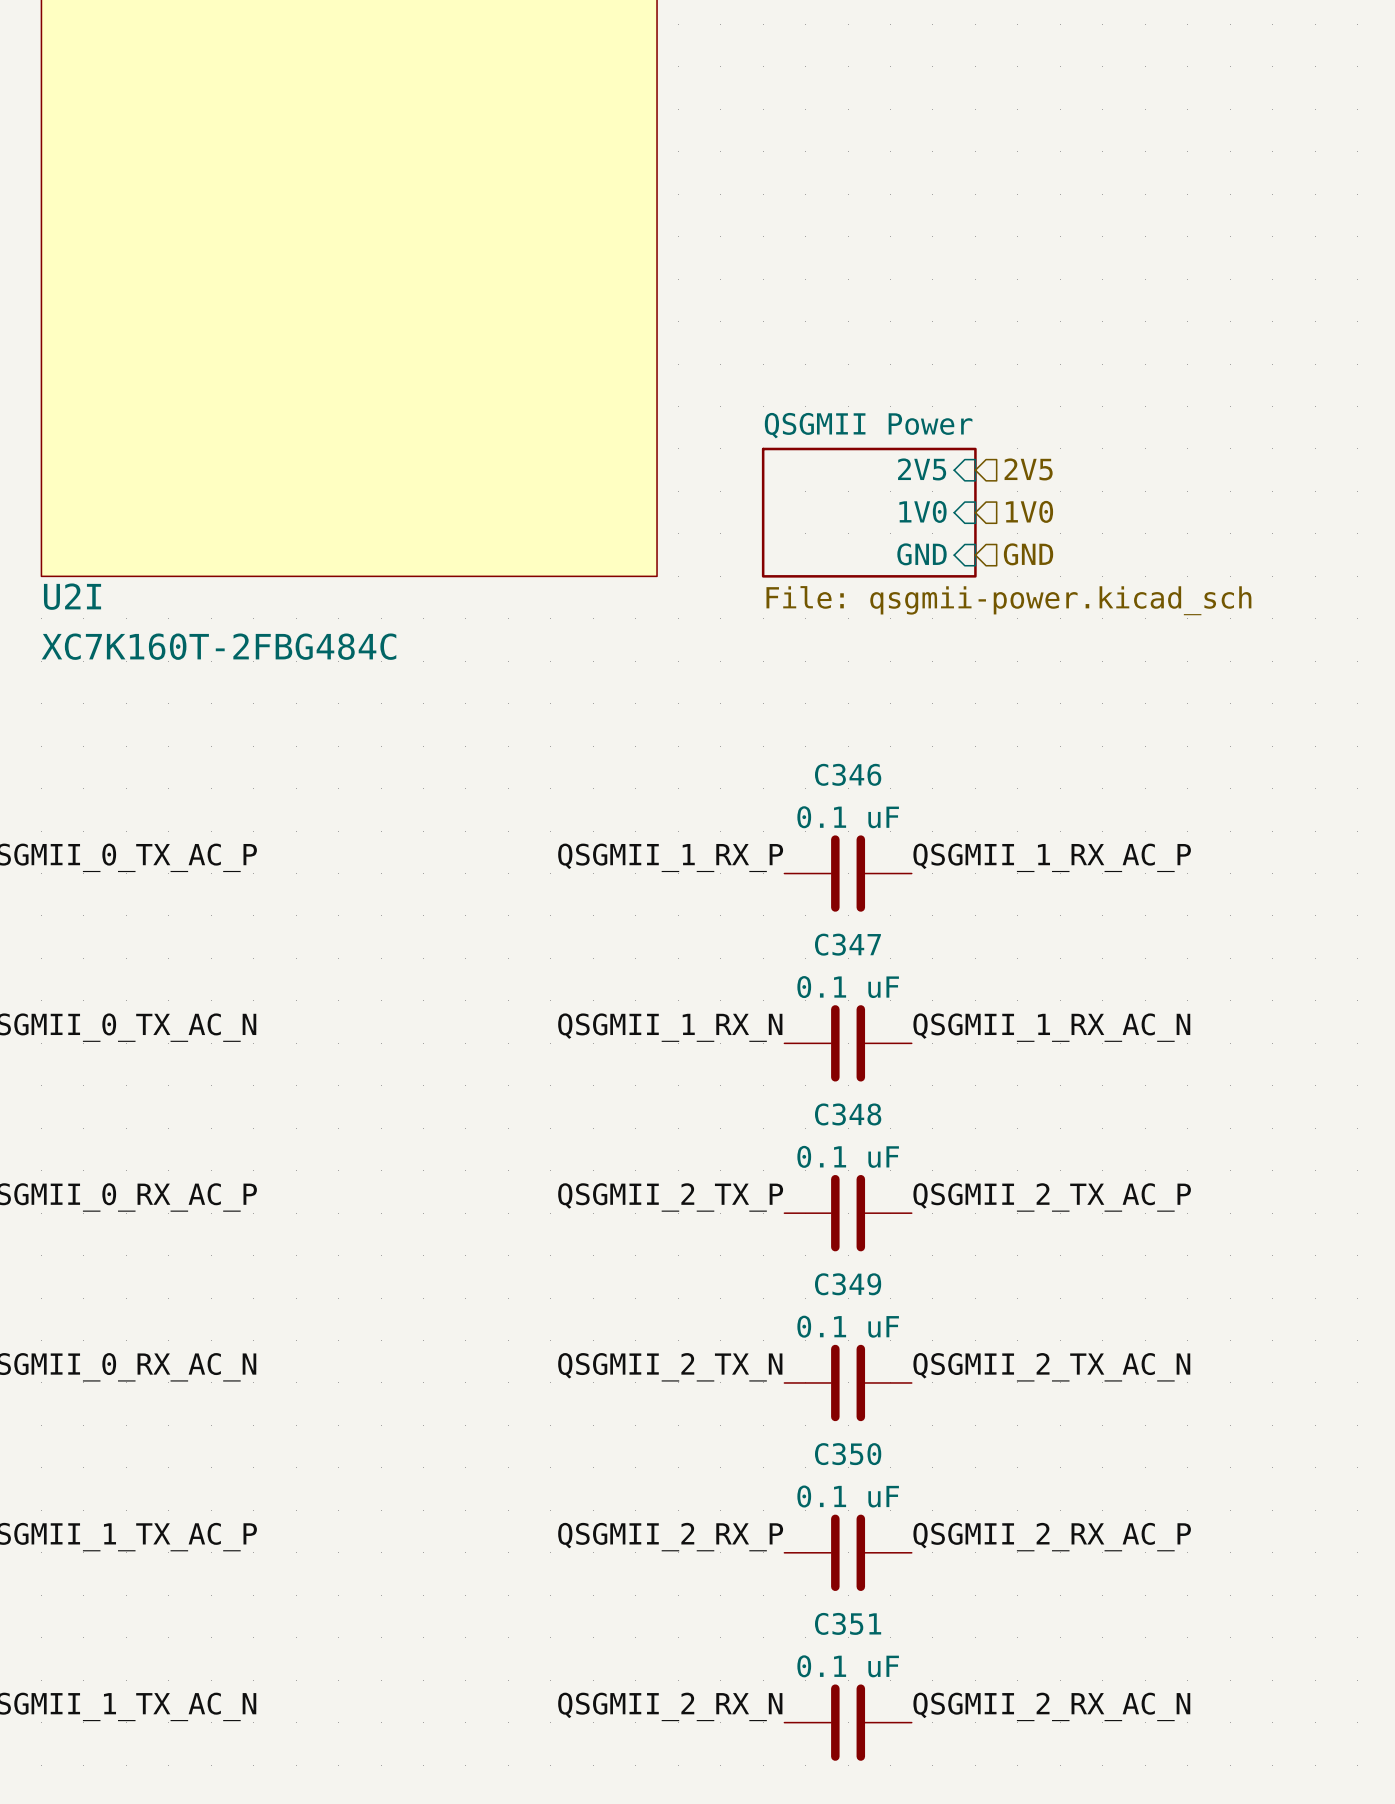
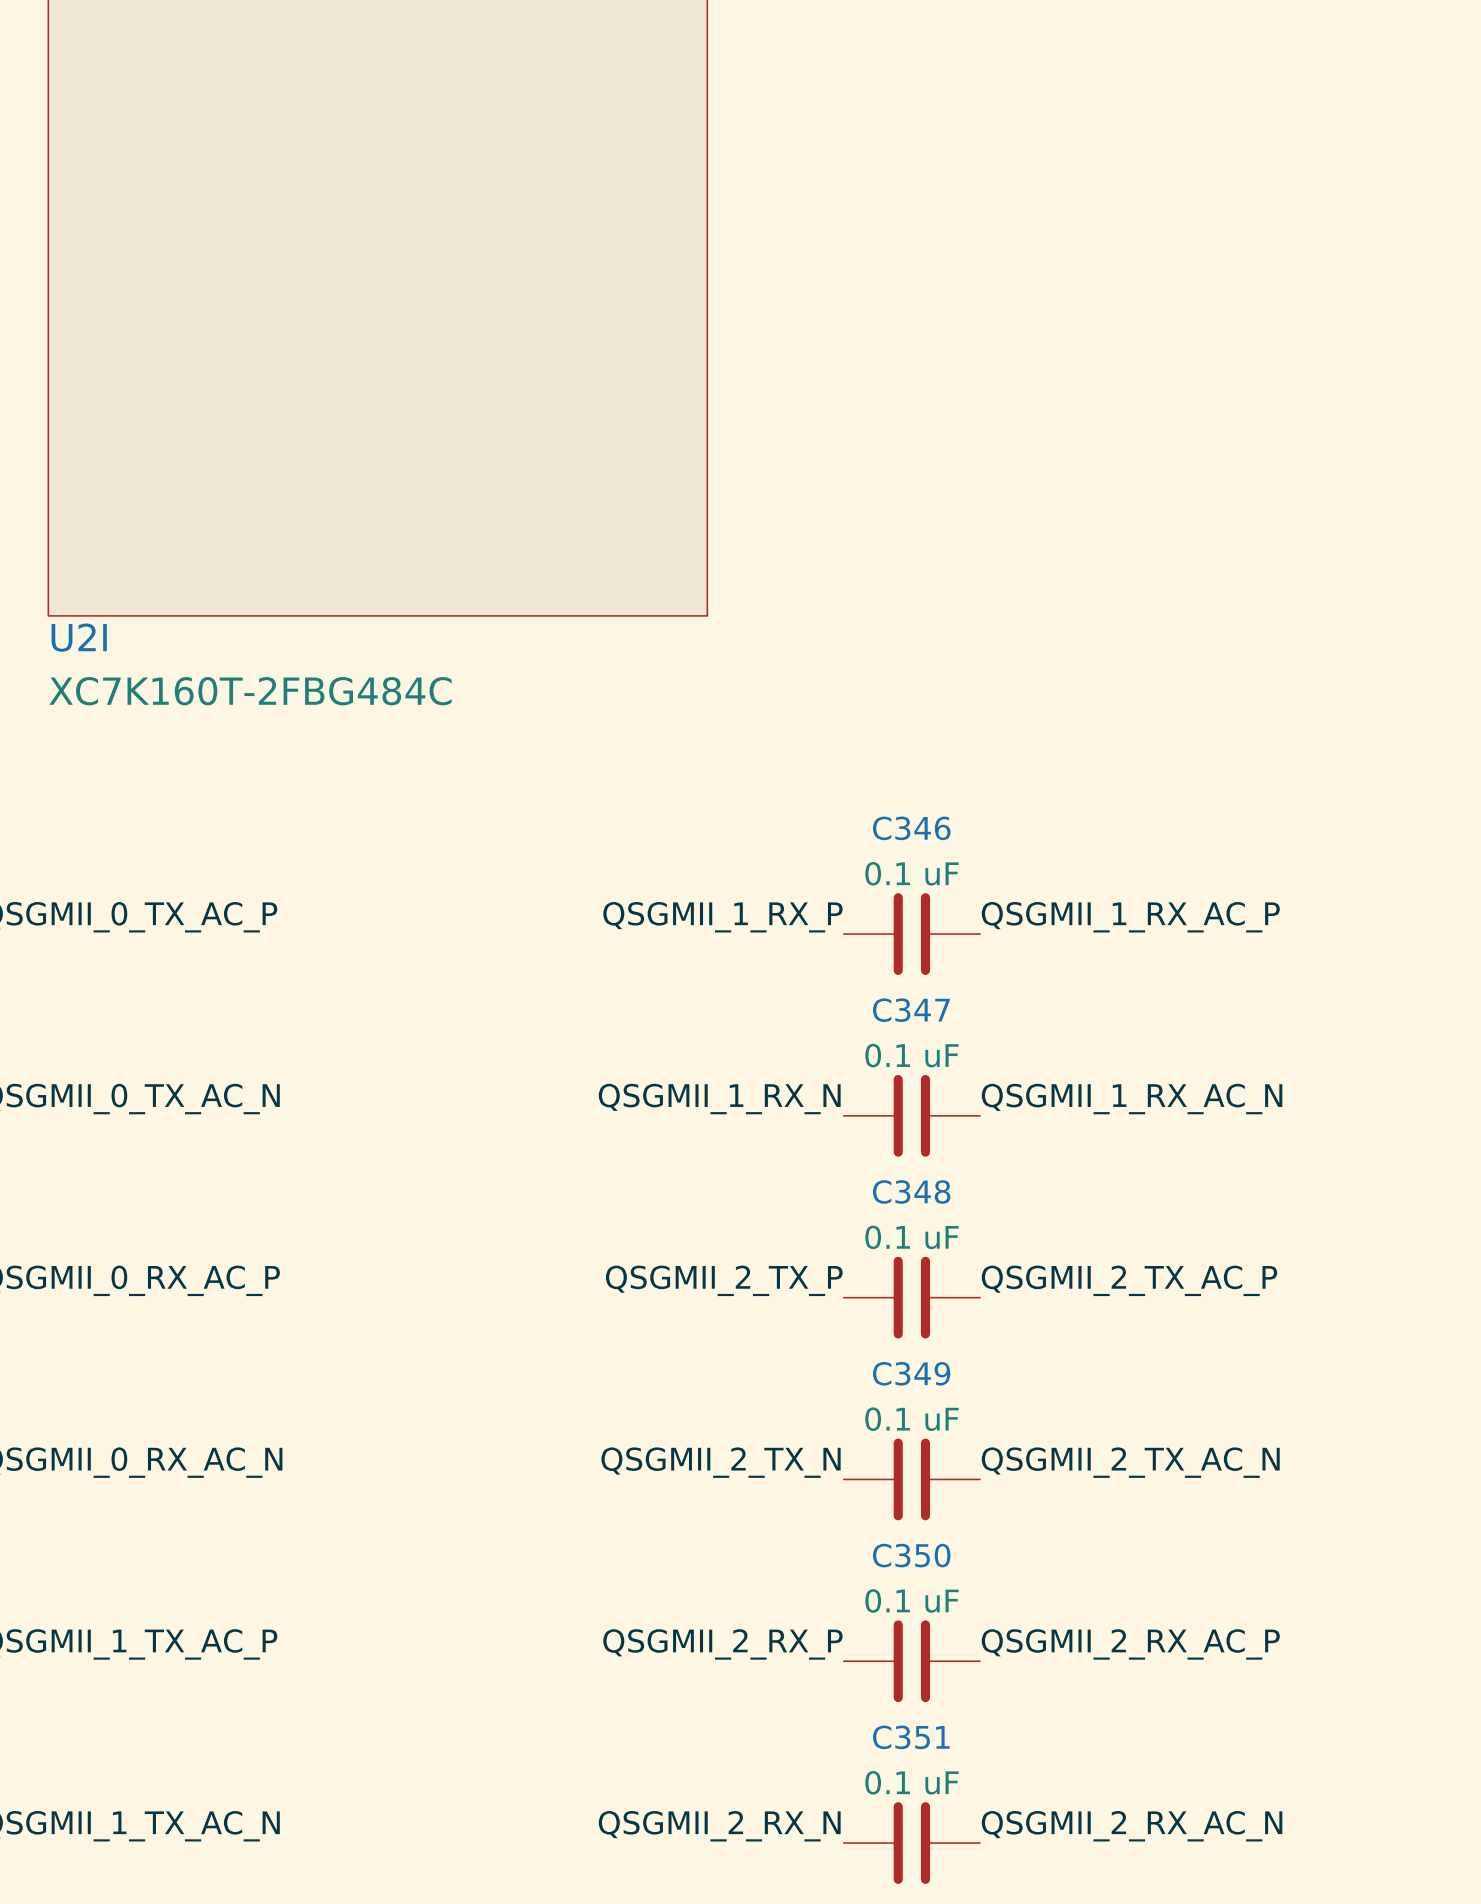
sheet pin: 2V5 (922, 469) -> none
hierarchical label: 2V5 (1028, 469) -> none
sheet pin: 1V0 (922, 511) -> none
hierarchical label: 1V0 (1029, 511) -> none
sheet QSGMII Power: File: qsgmii-power.kicad_sch (869, 512) -> none
sheet pin: GND (922, 554) -> none
hierarchical label: GND (1028, 554) -> none

